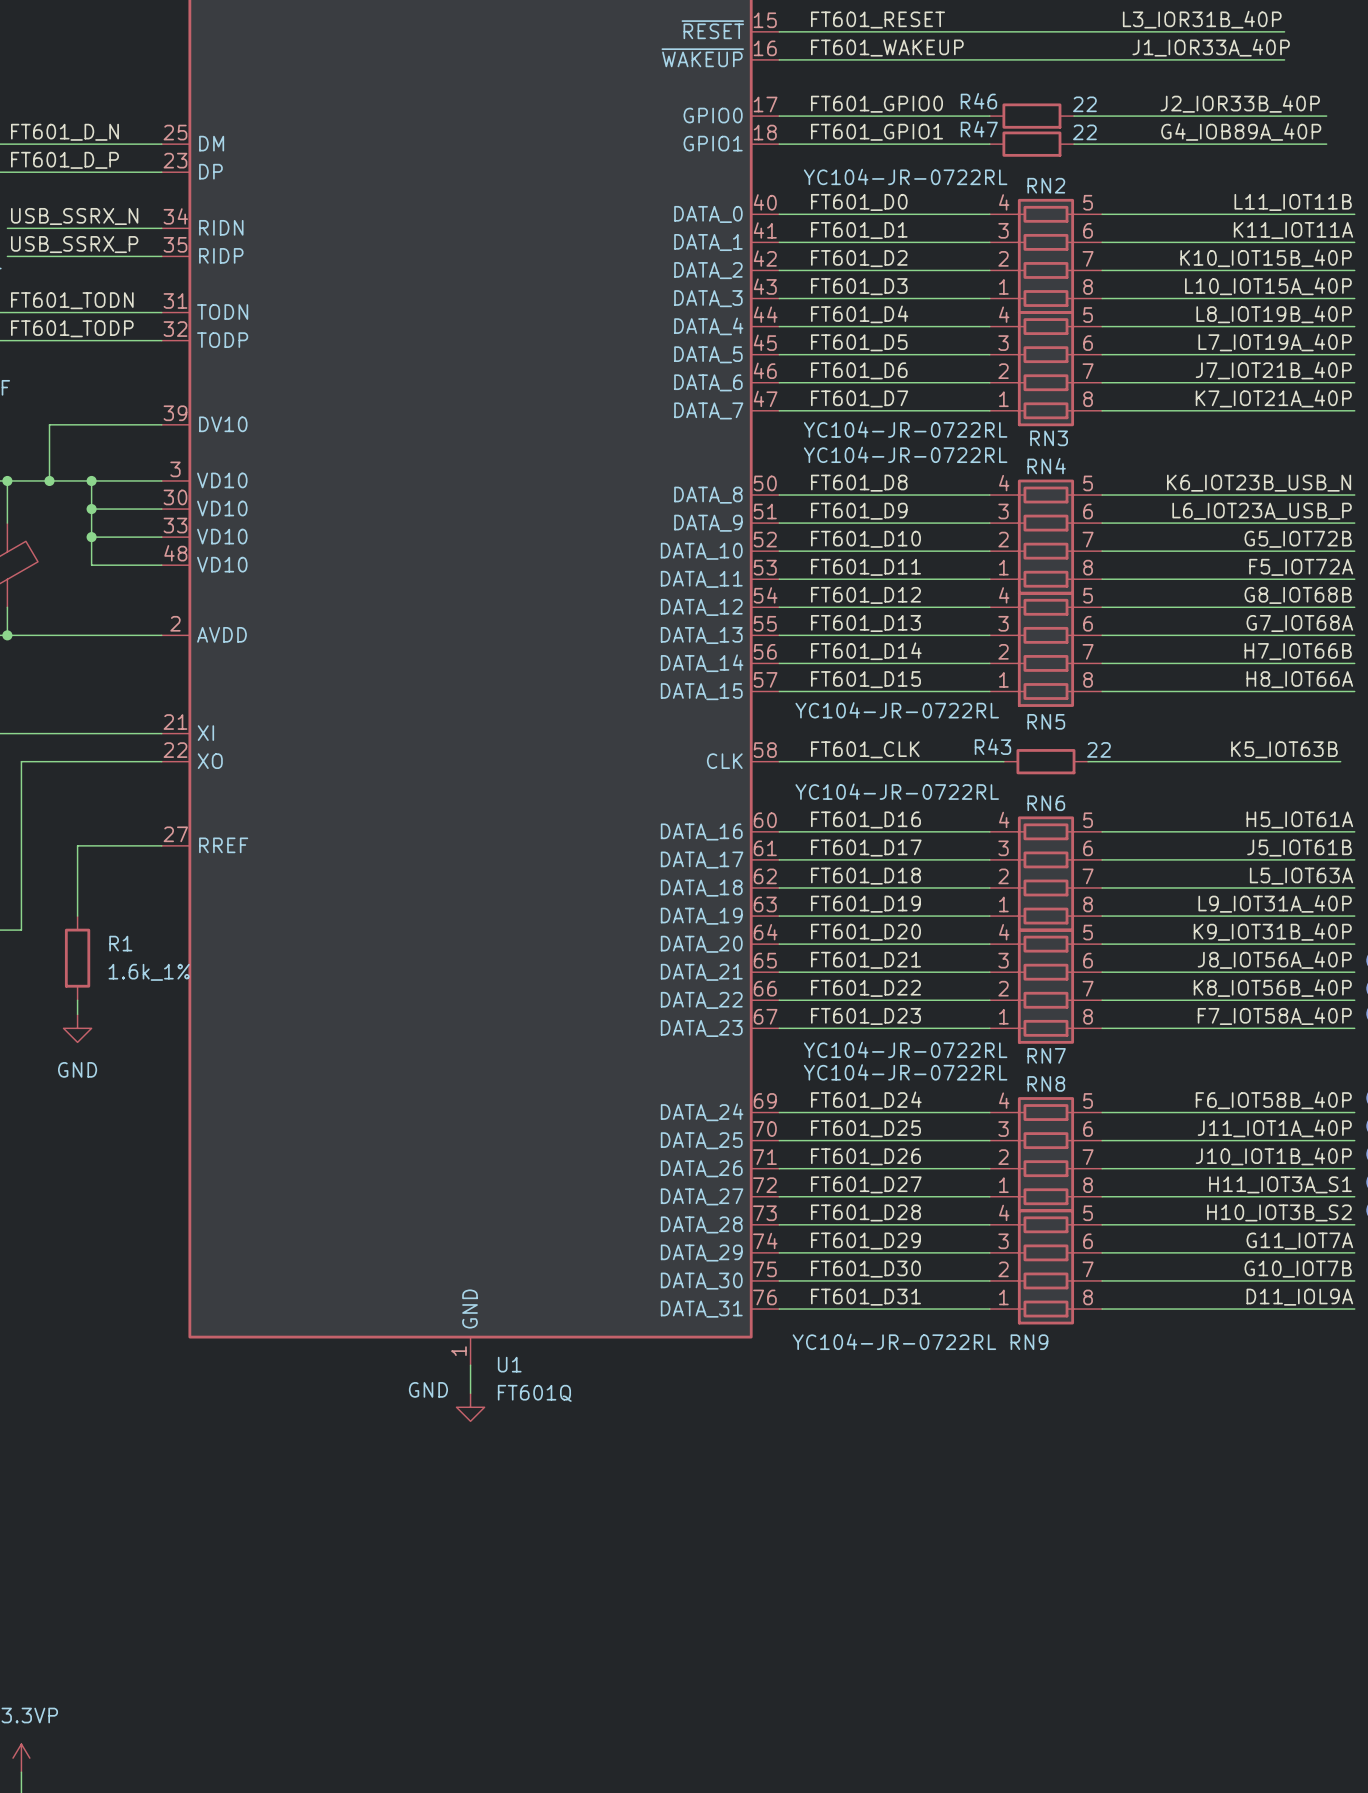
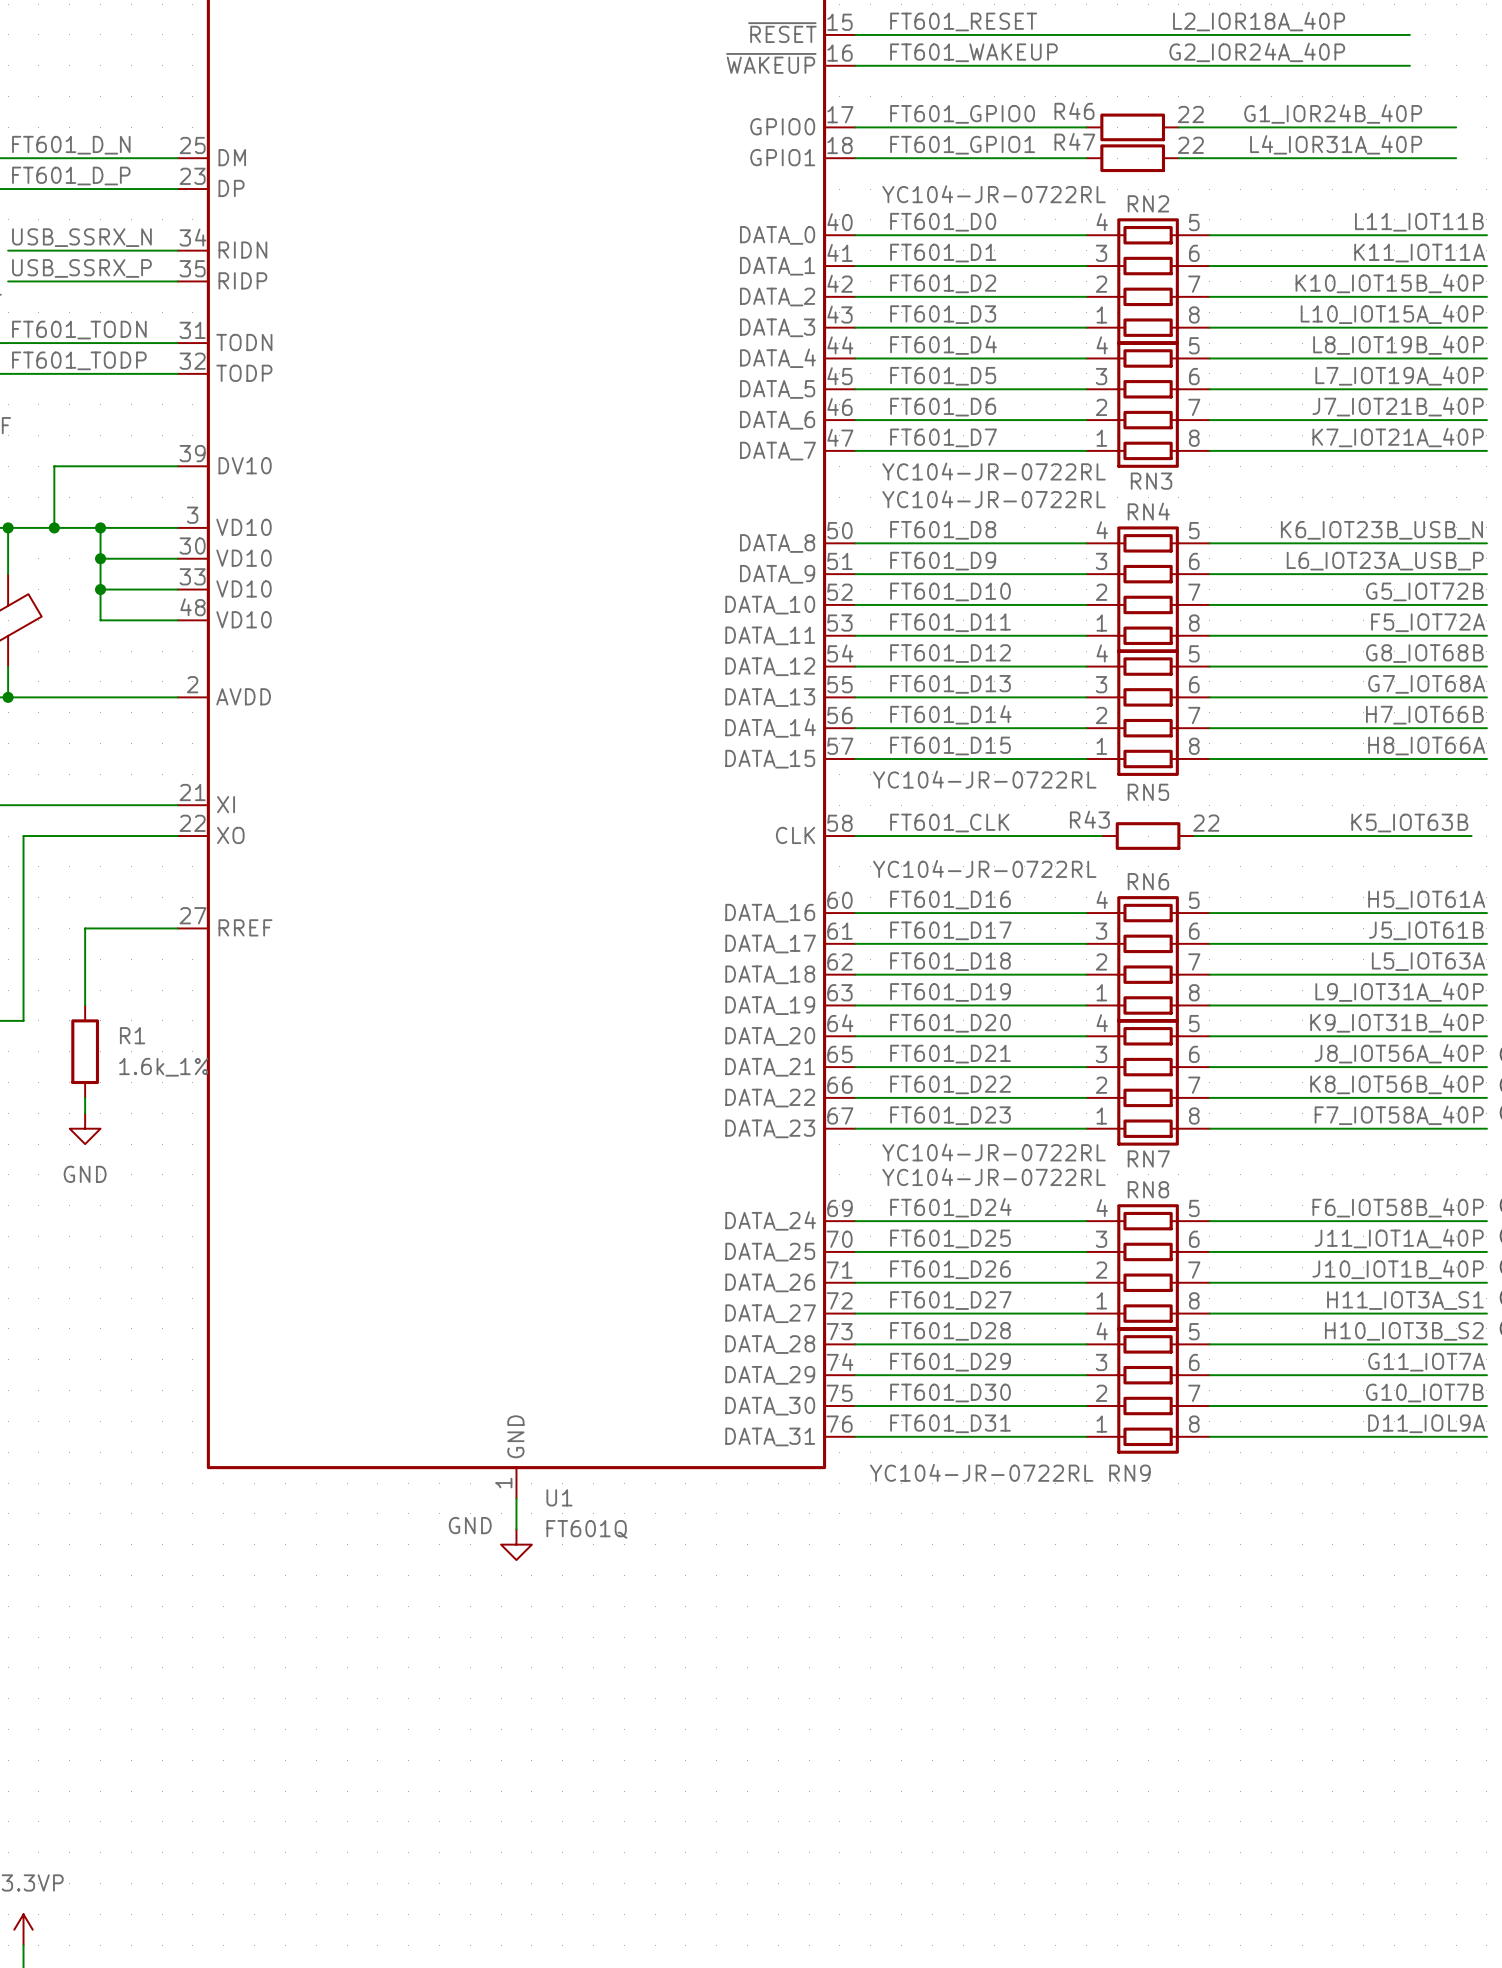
label: none -> L2_IOR18A_40P (1259, 21)
label: L3_IOR31B_40P (1202, 19) -> none
label: none -> G2_IOR24A_40P (1257, 52)
label: J1_IOR33A_40P (1211, 47) -> none
label: none -> G1_IOR24B_40P (1333, 114)
label: J2_IOR33B_40P (1240, 103) -> none
label: none -> L4_IOR31A_40P (1336, 144)
label: G4_IOB89A_40P (1241, 131) -> none

